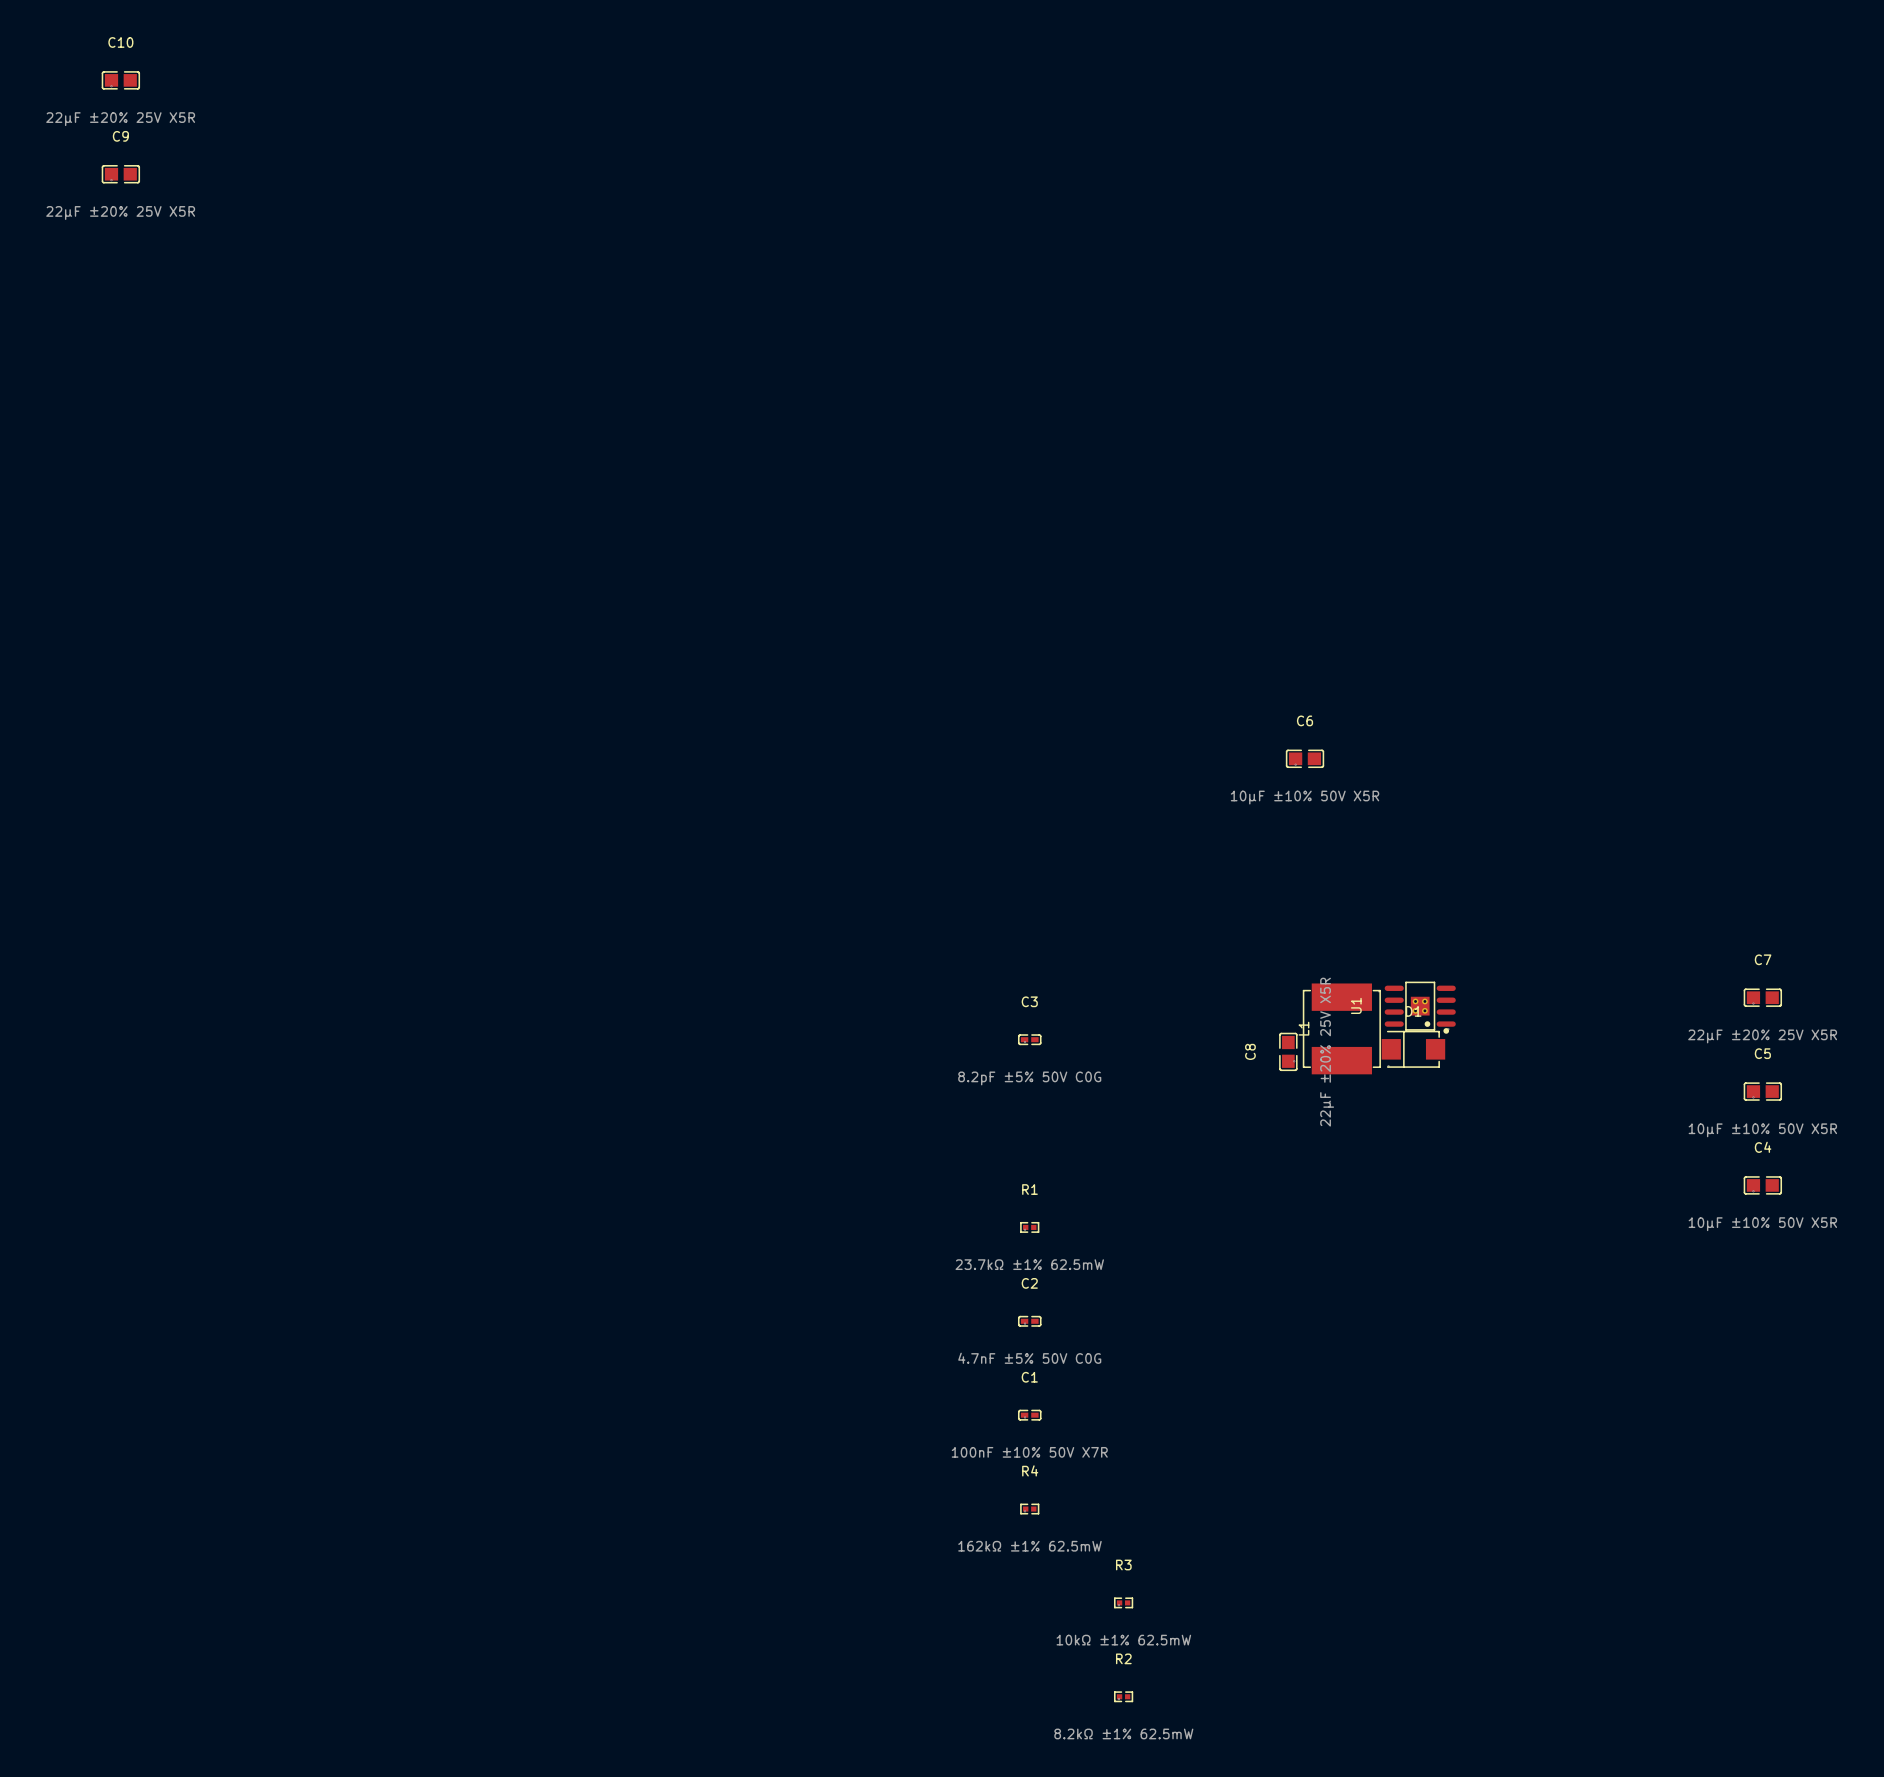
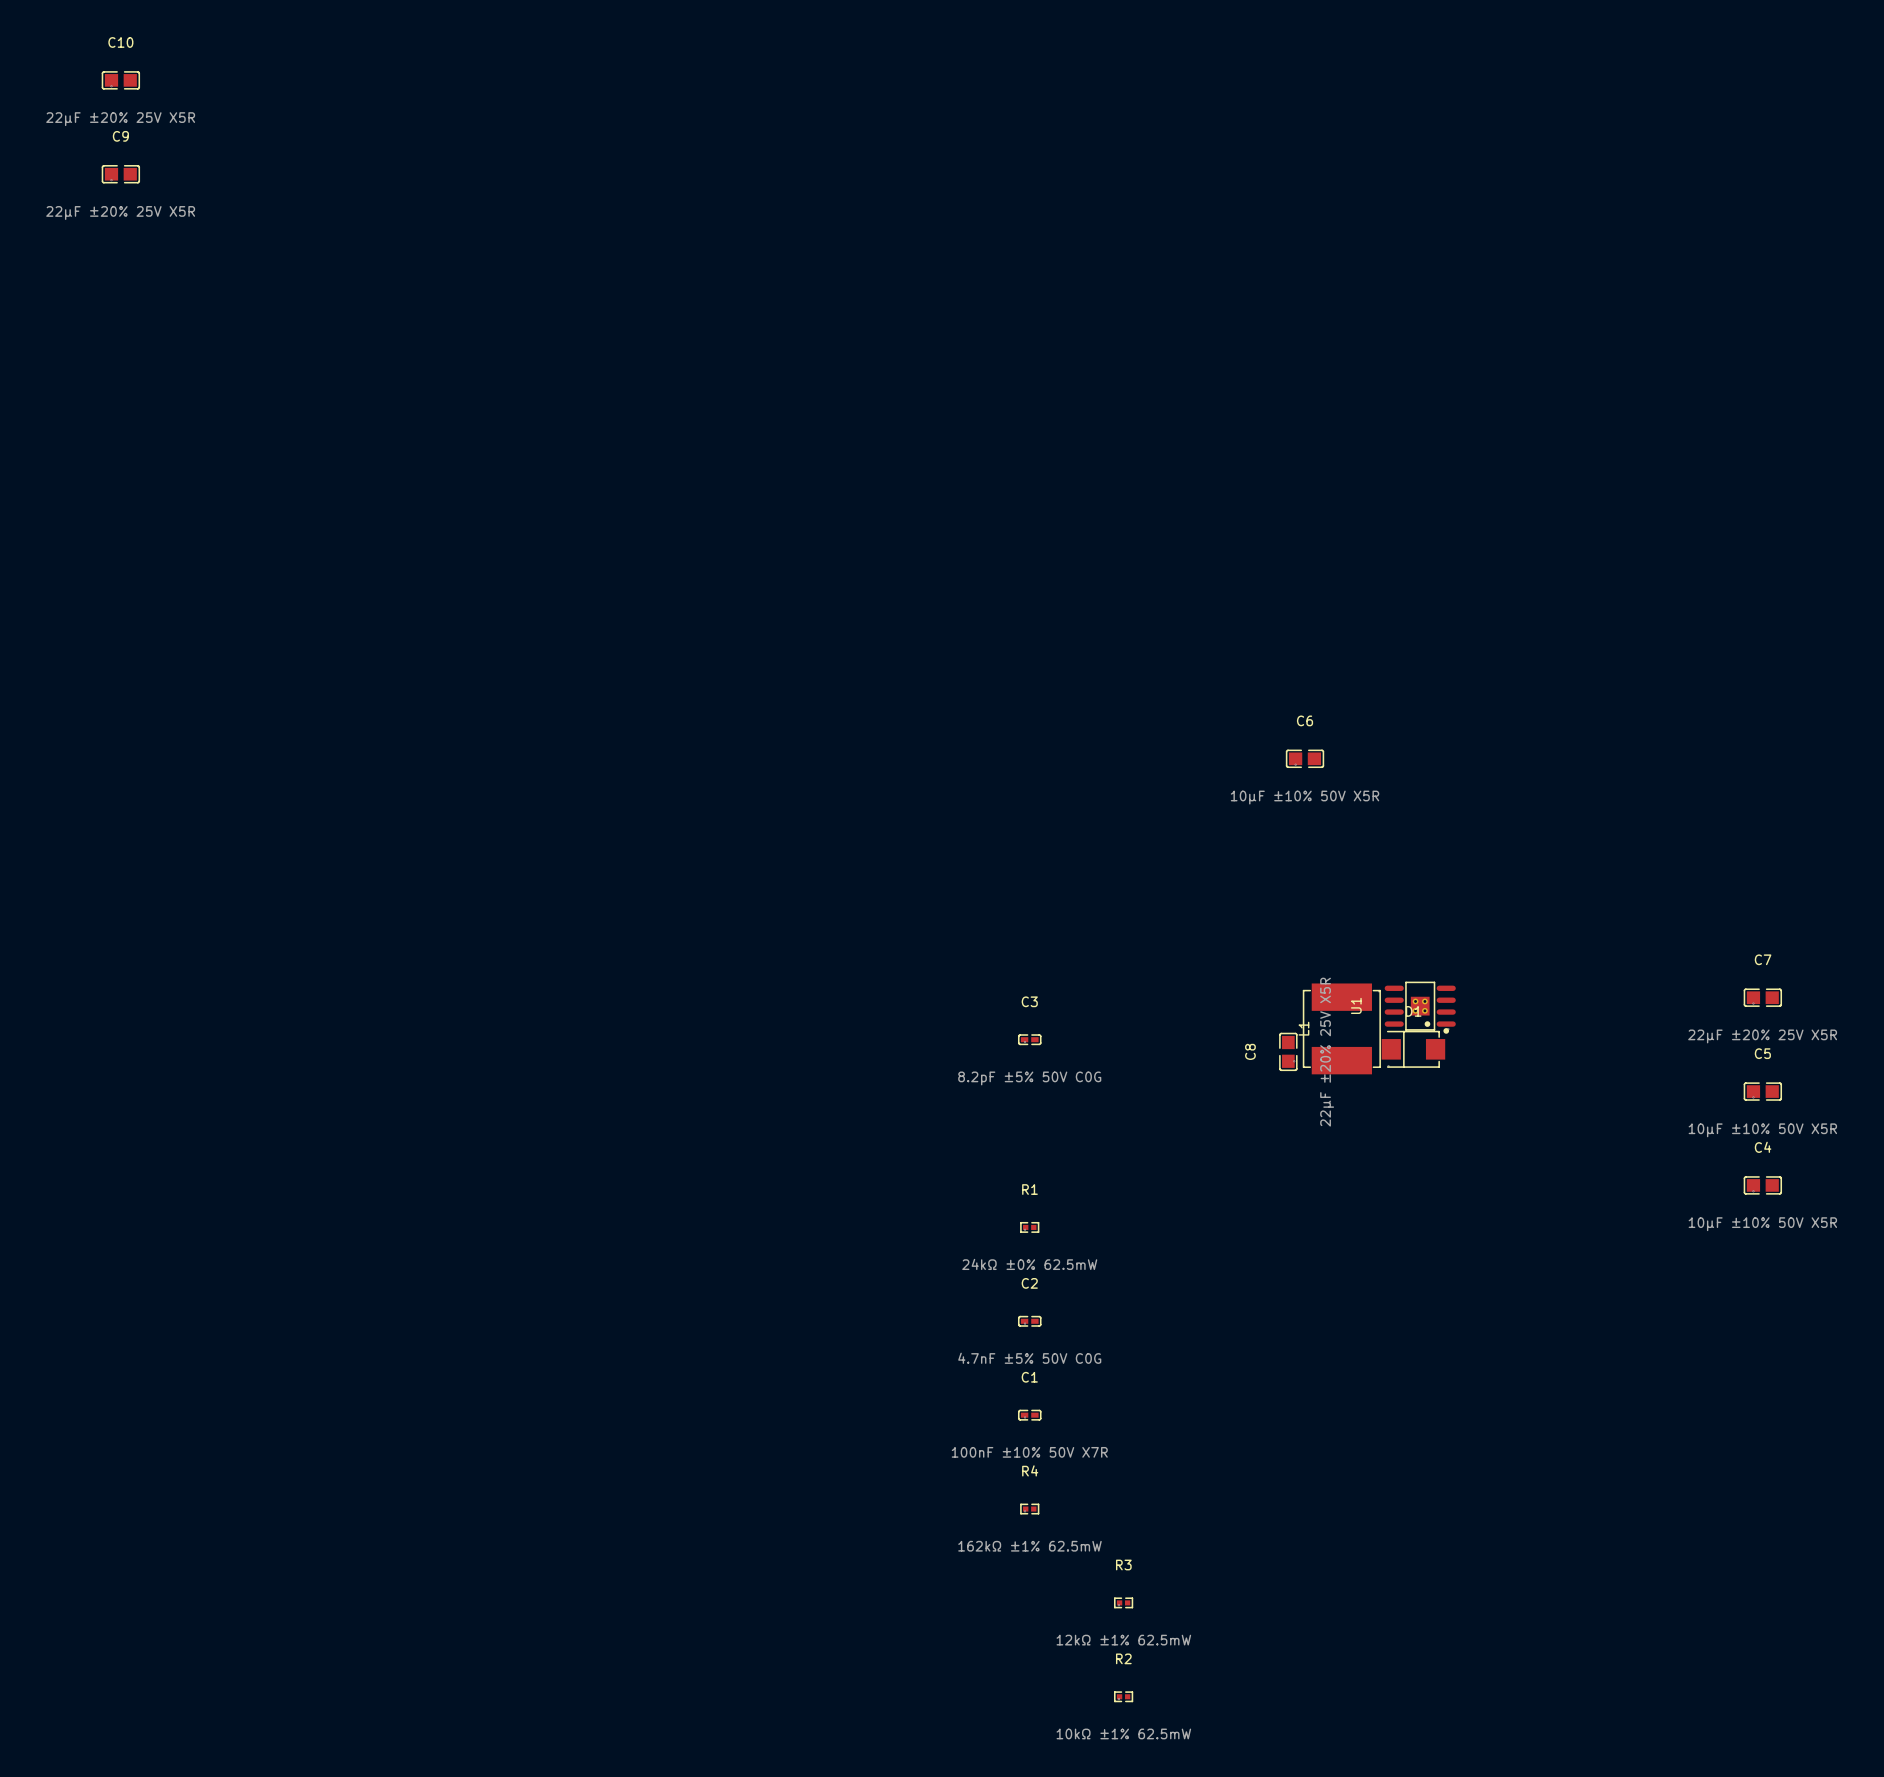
R1 value: 23.7kΩ ±1% 62.5mW (1029, 1264) -> 24kΩ ±0% 62.5mW (1029, 1264)
R3 value: 10kΩ ±1% 62.5mW (1123, 1640) -> 12kΩ ±1% 62.5mW (1123, 1640)
R2 value: 8.2kΩ ±1% 62.5mW (1123, 1733) -> 10kΩ ±1% 62.5mW (1123, 1733)

